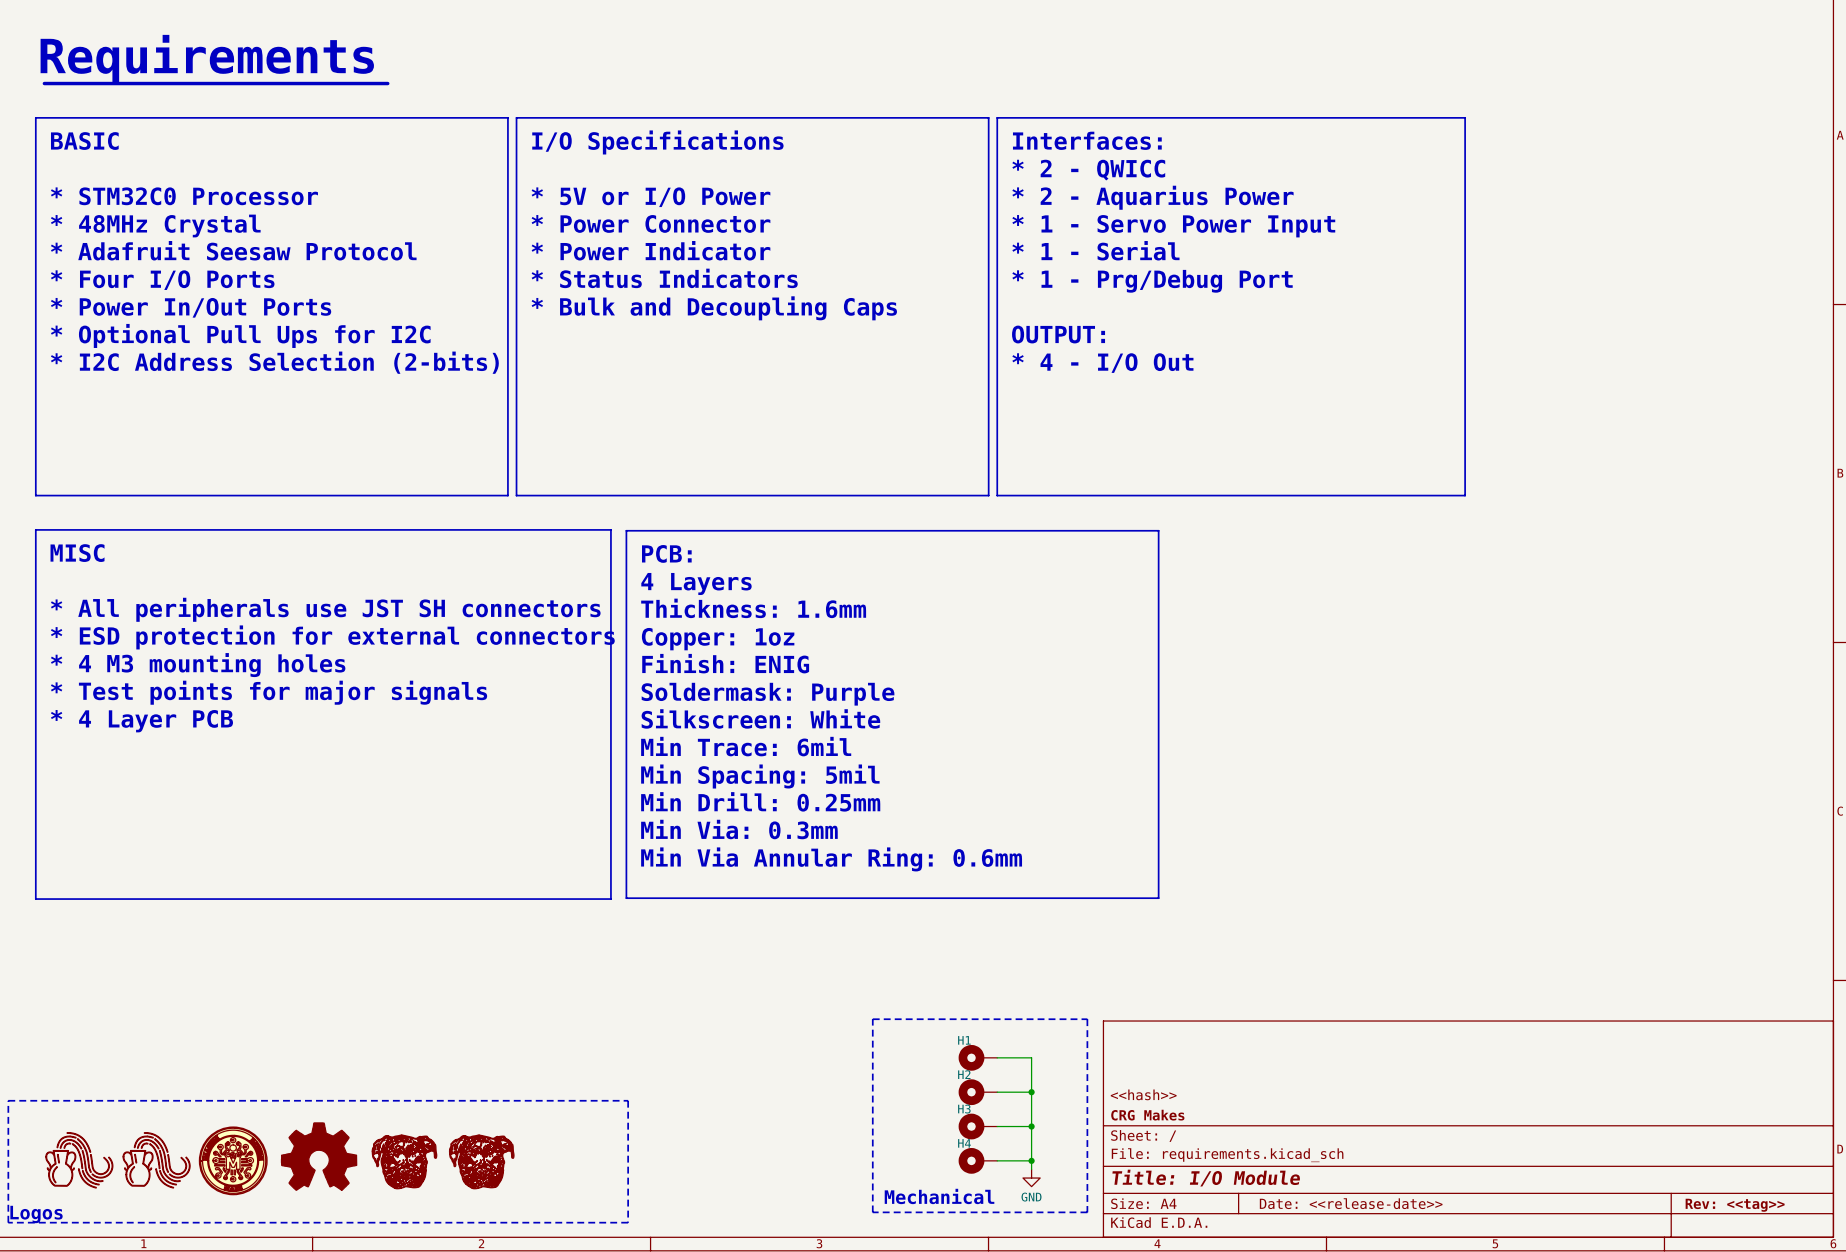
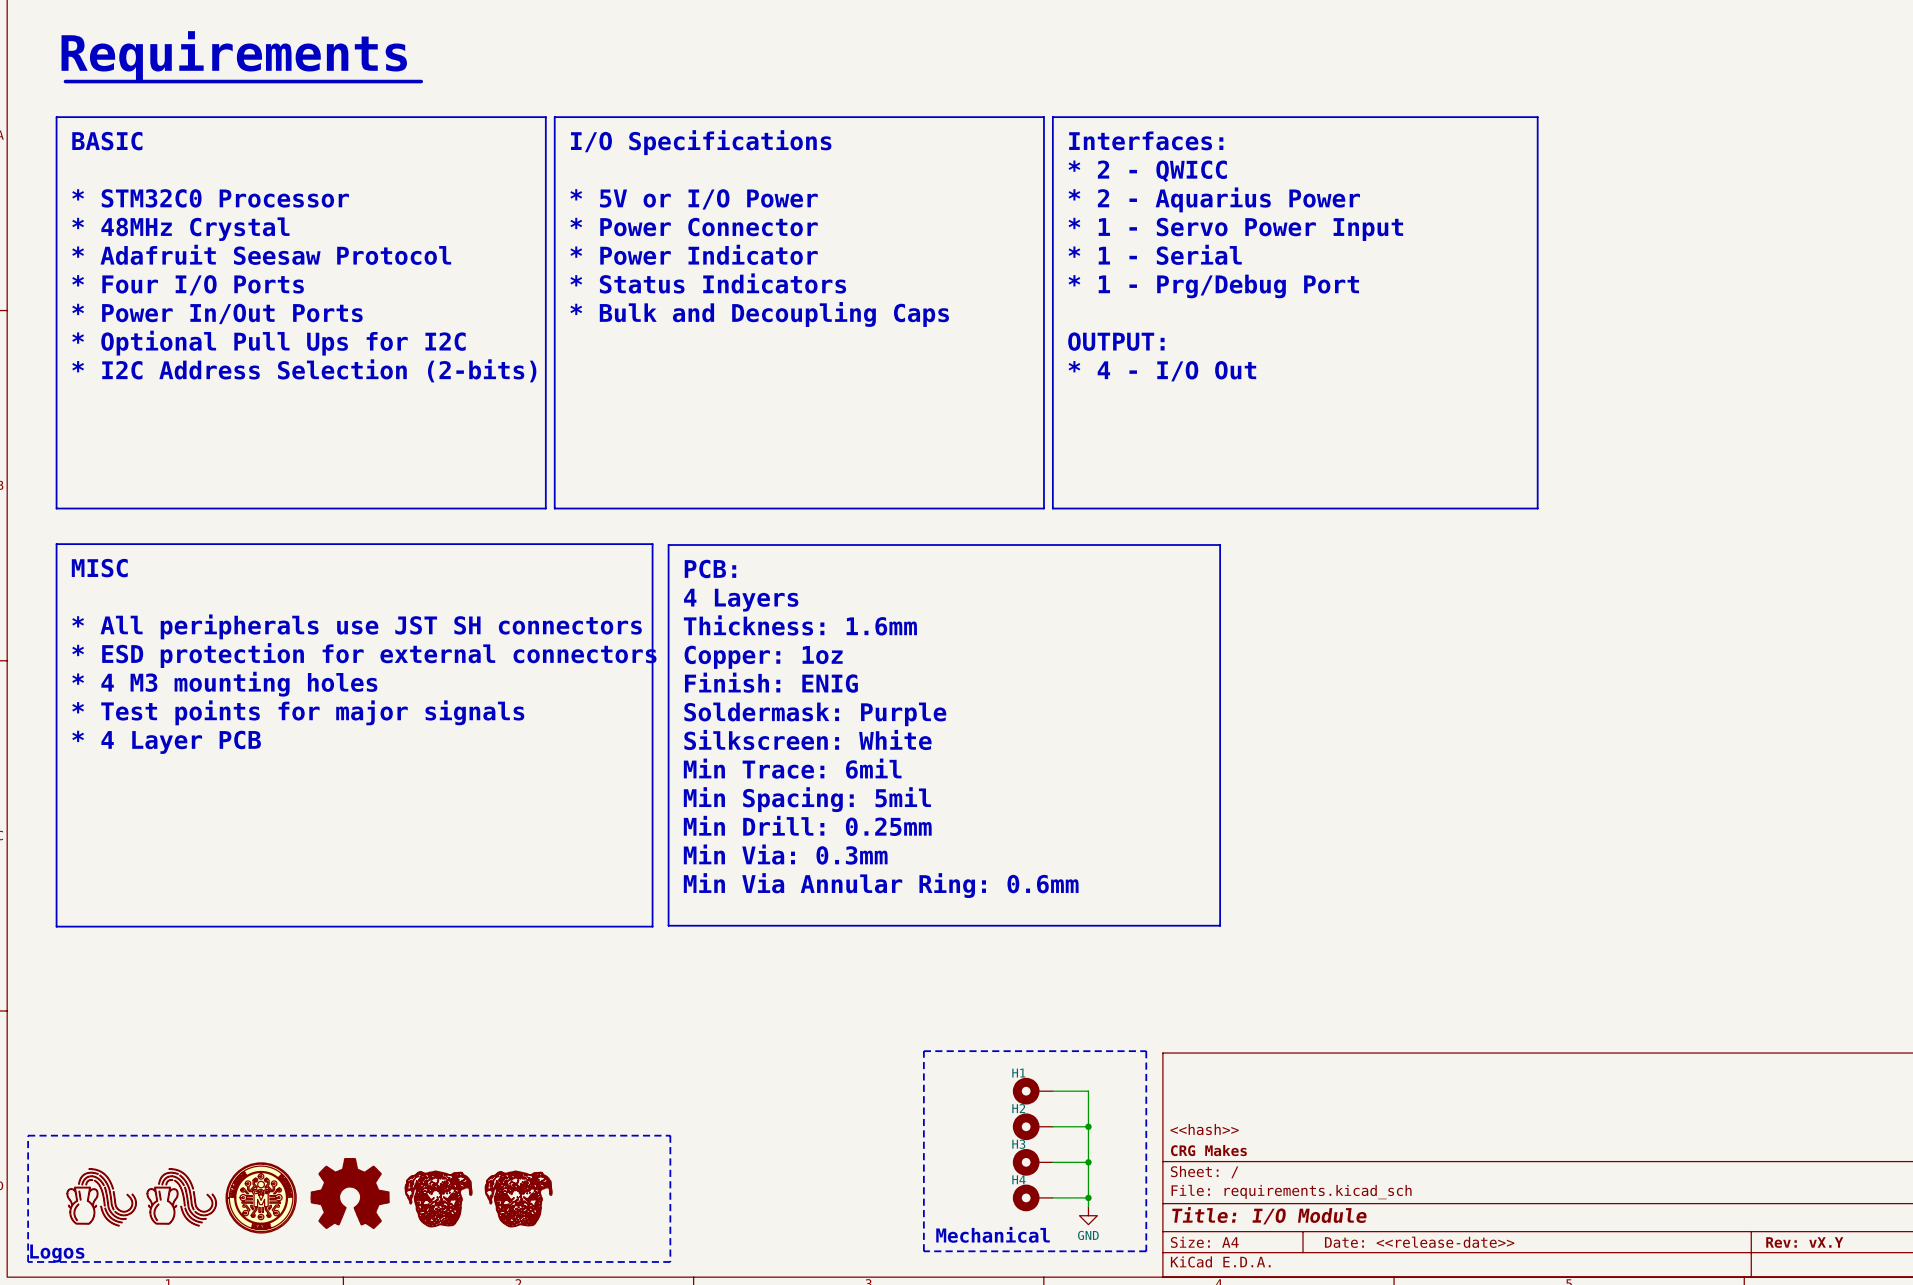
title block: Rev: <<tag>> (1735, 1205) -> Rev: vX.Y (1804, 1242)

